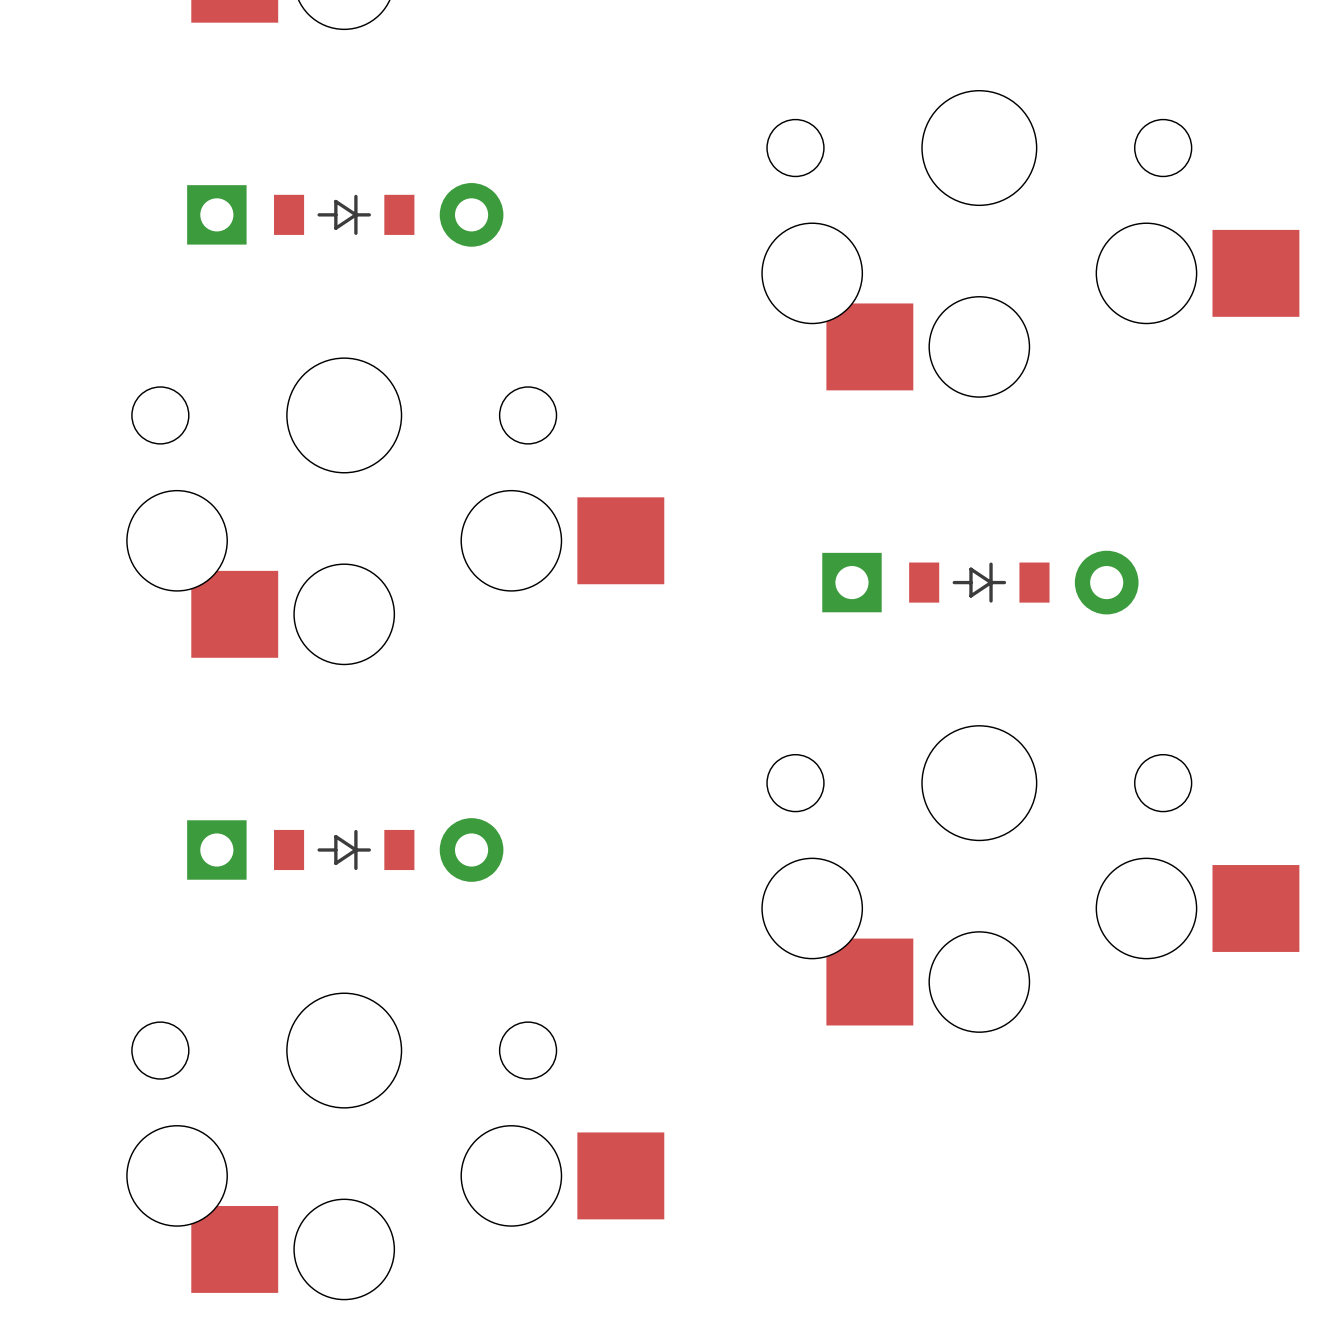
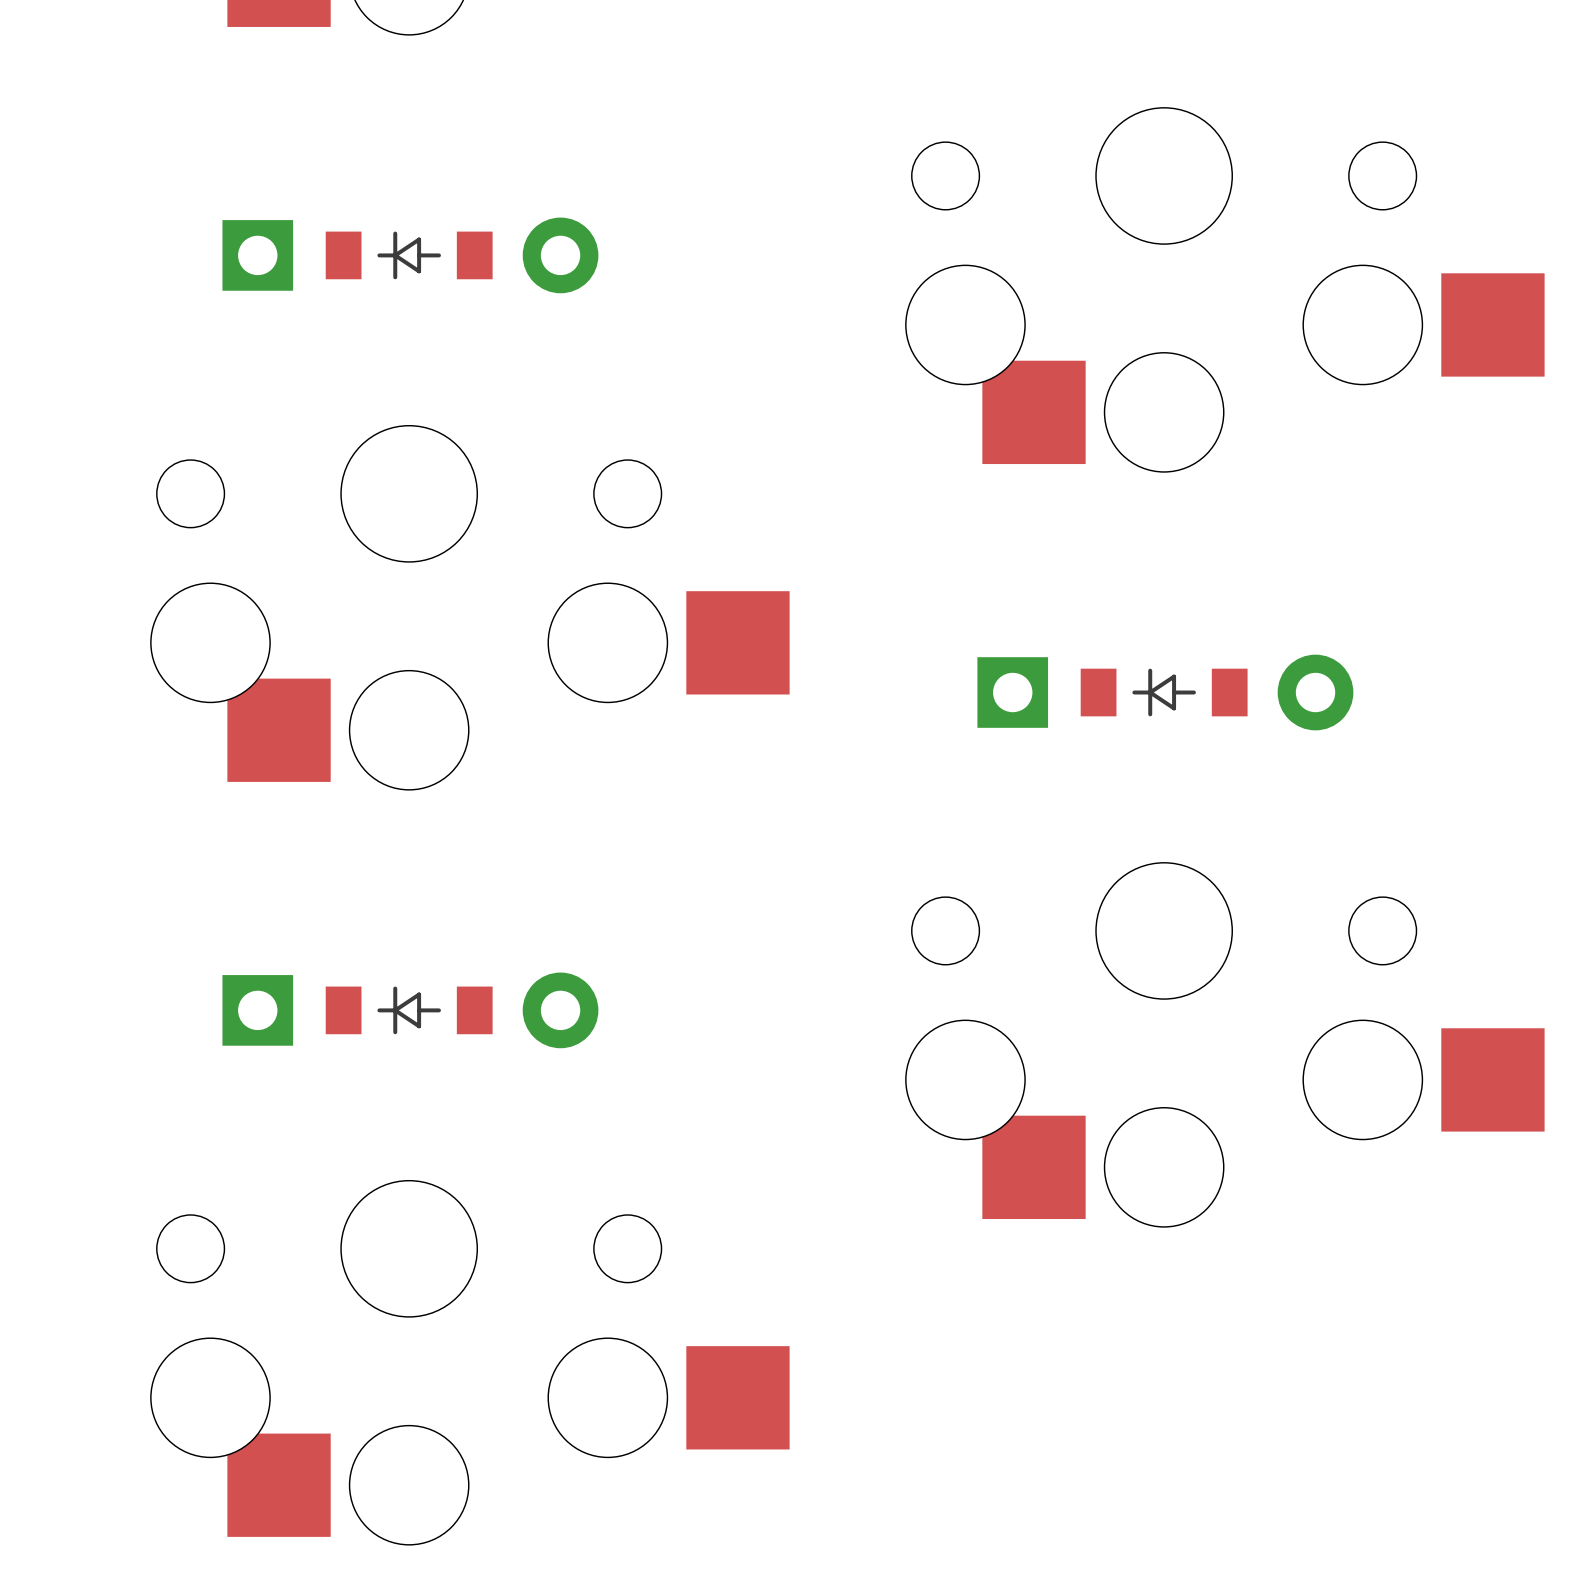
part footprint: [187, 183, 504, 247] -> [222, 217, 599, 294]
part footprint: [822, 550, 1139, 615] -> [977, 654, 1354, 731]
part footprint: [187, 818, 504, 882] -> [222, 972, 599, 1049]

